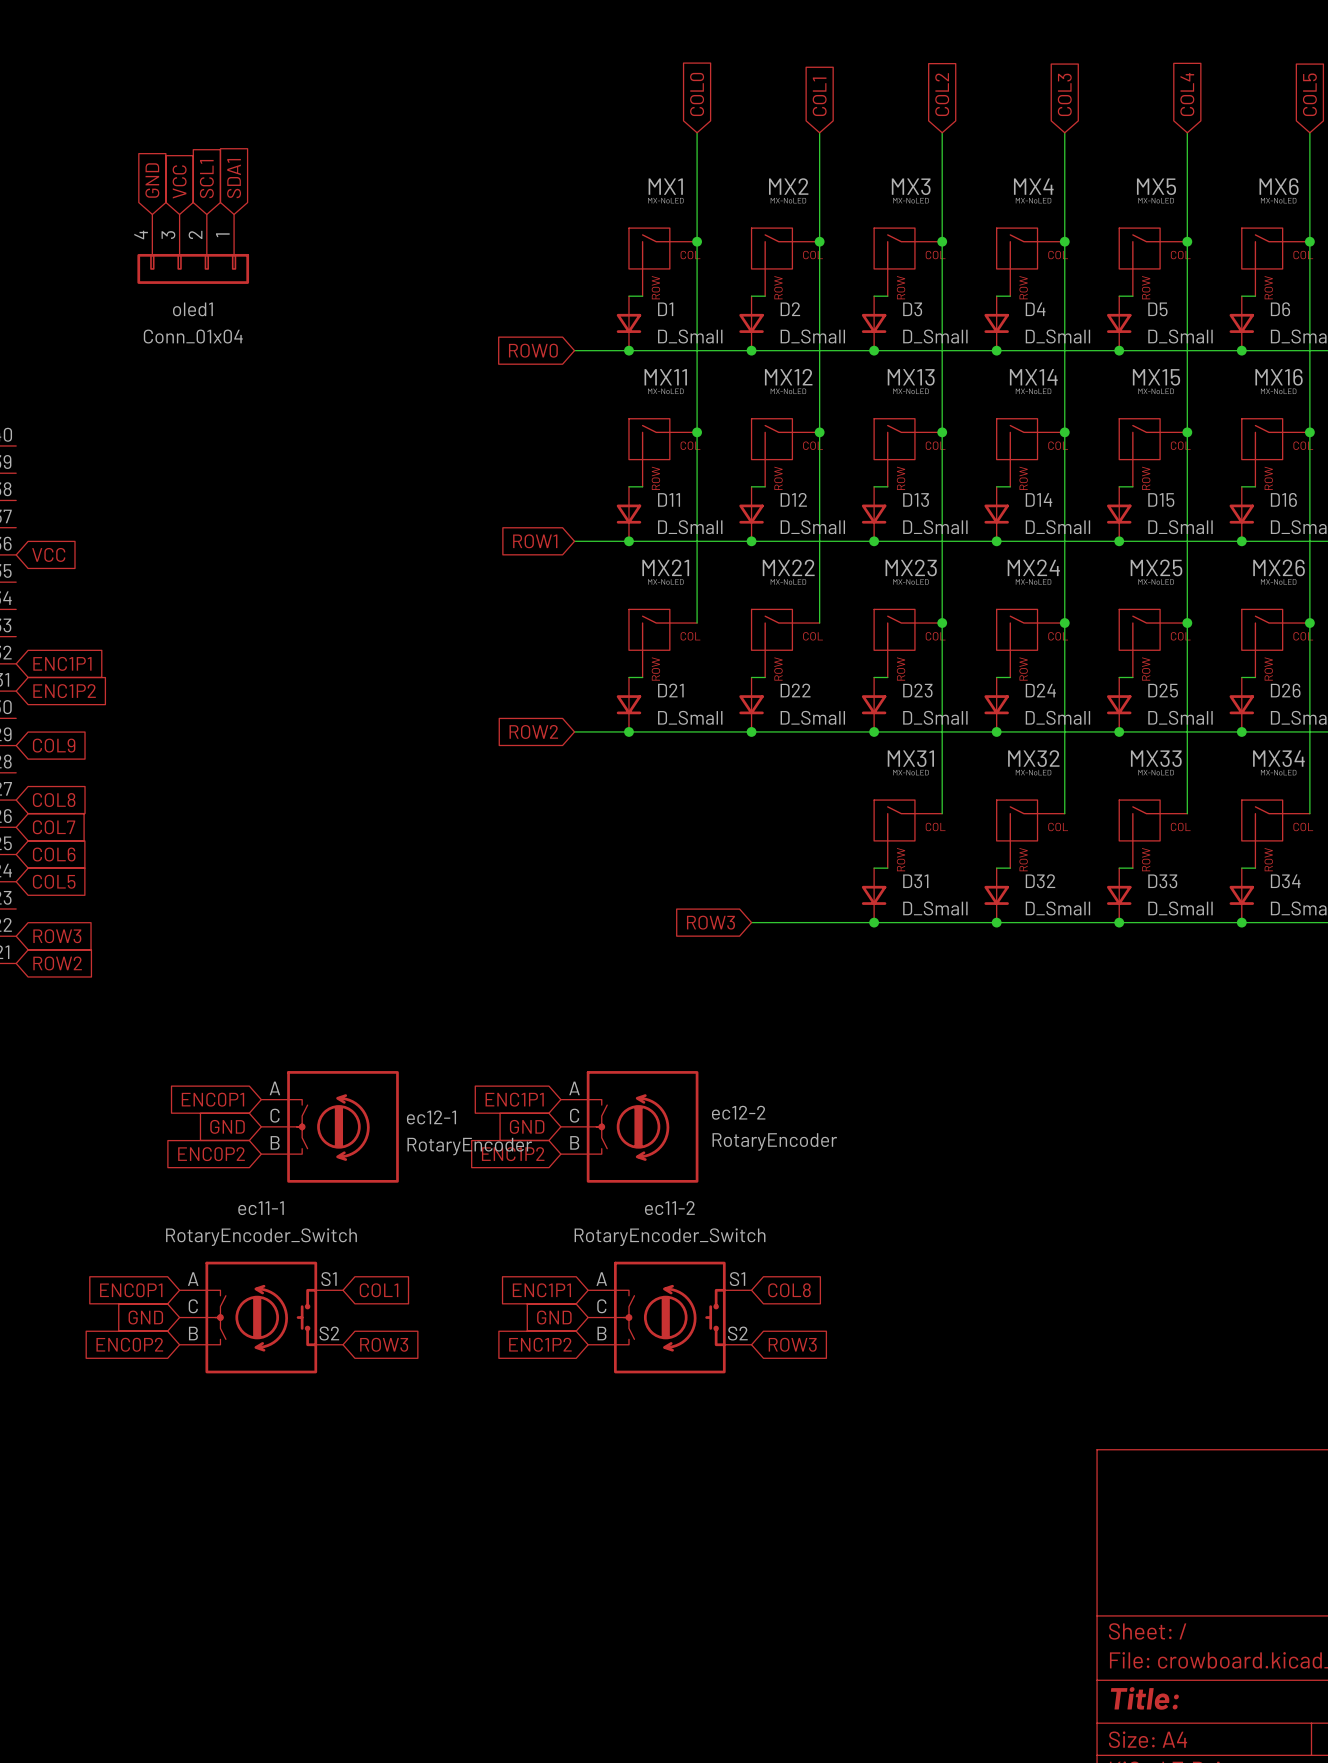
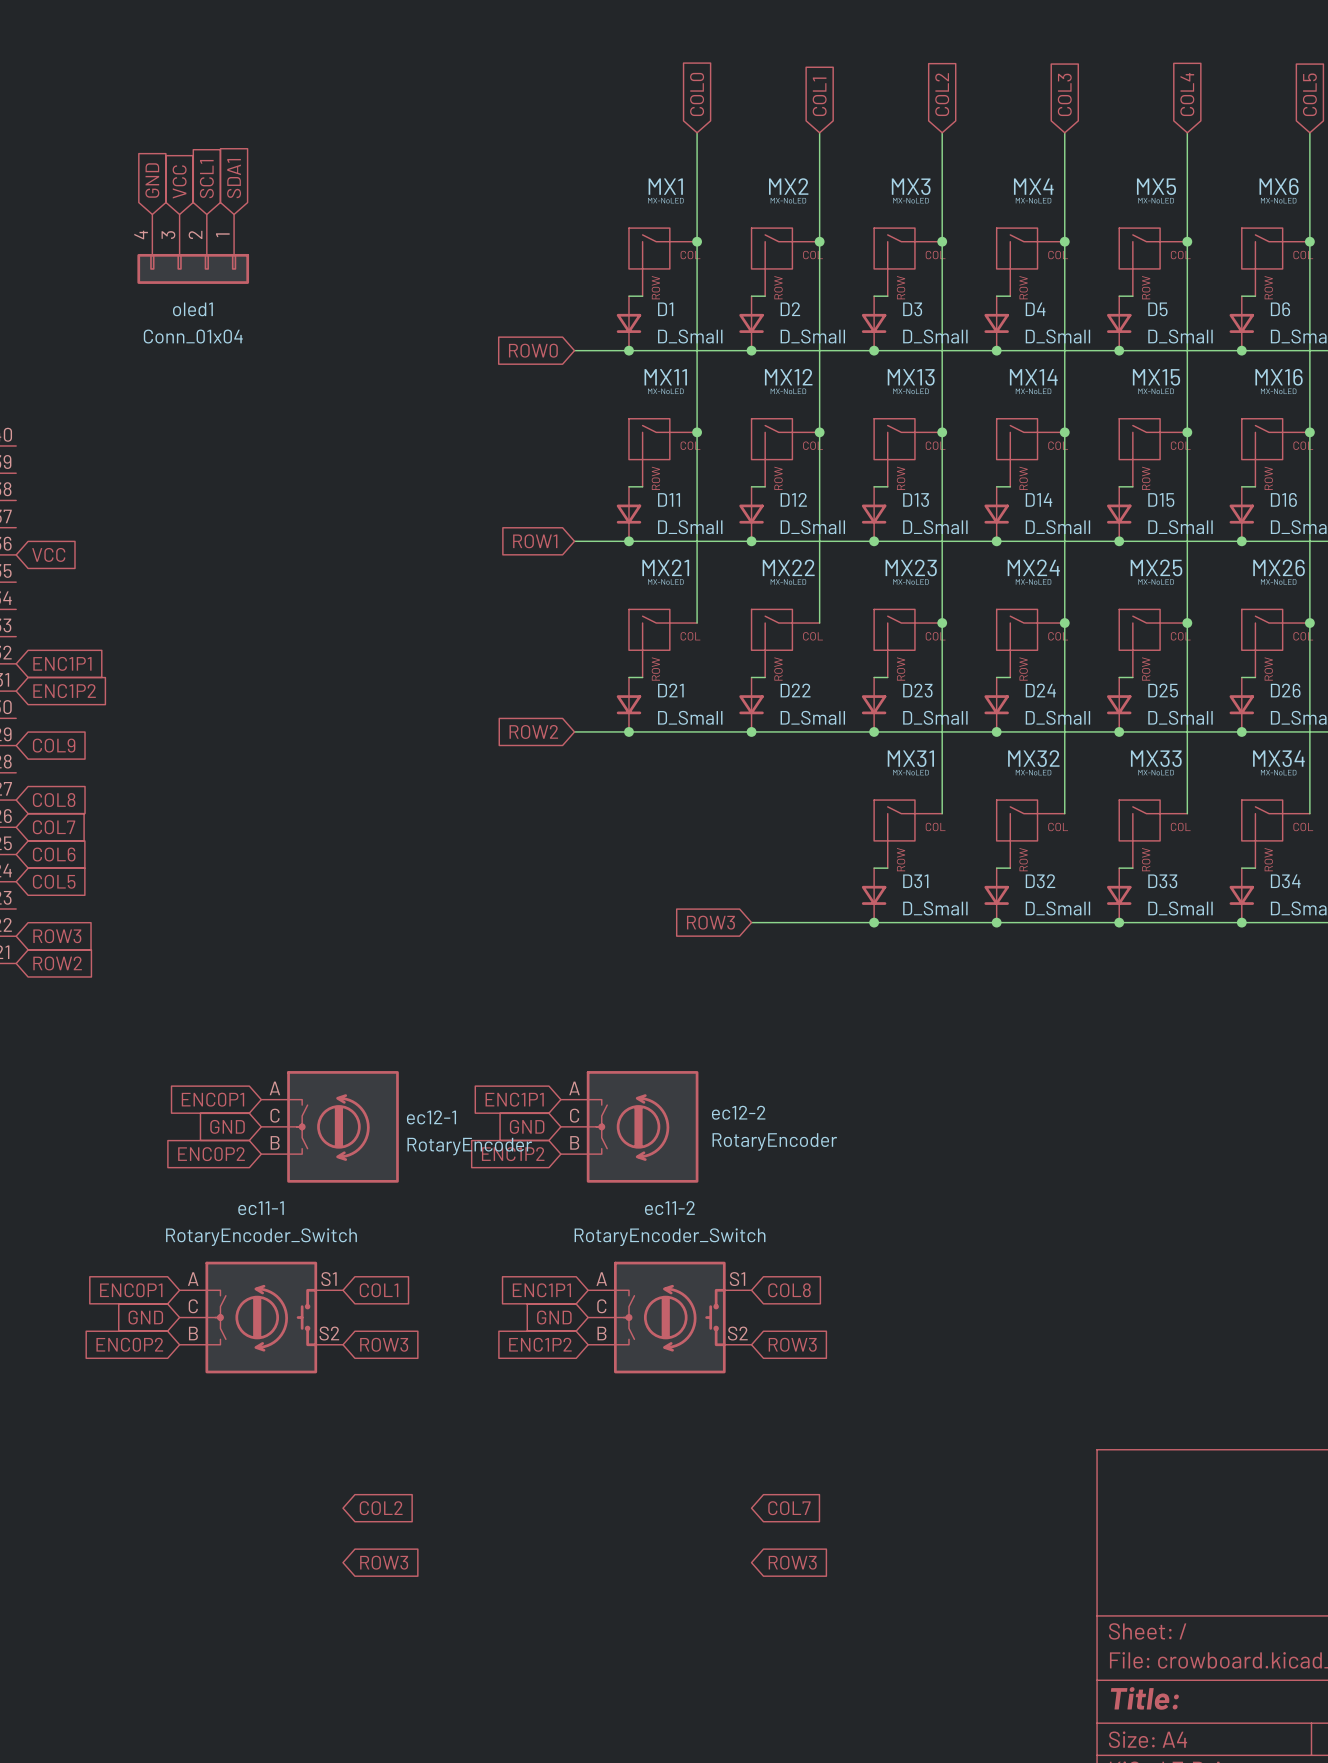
global label: none -> COL2 (381, 1508)
global label: none -> COL7 (789, 1508)
global label: none -> ROW3 (384, 1562)
global label: none -> ROW3 (792, 1562)

